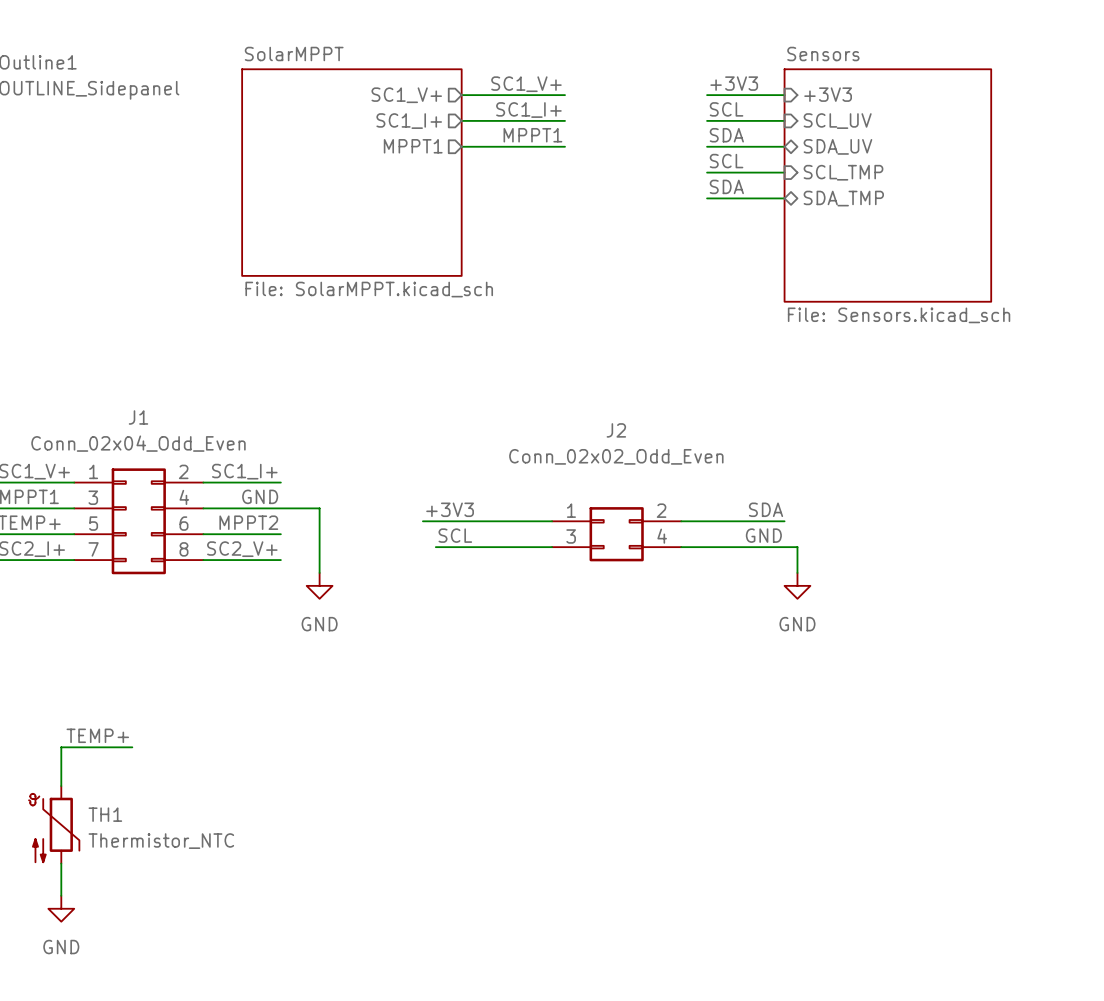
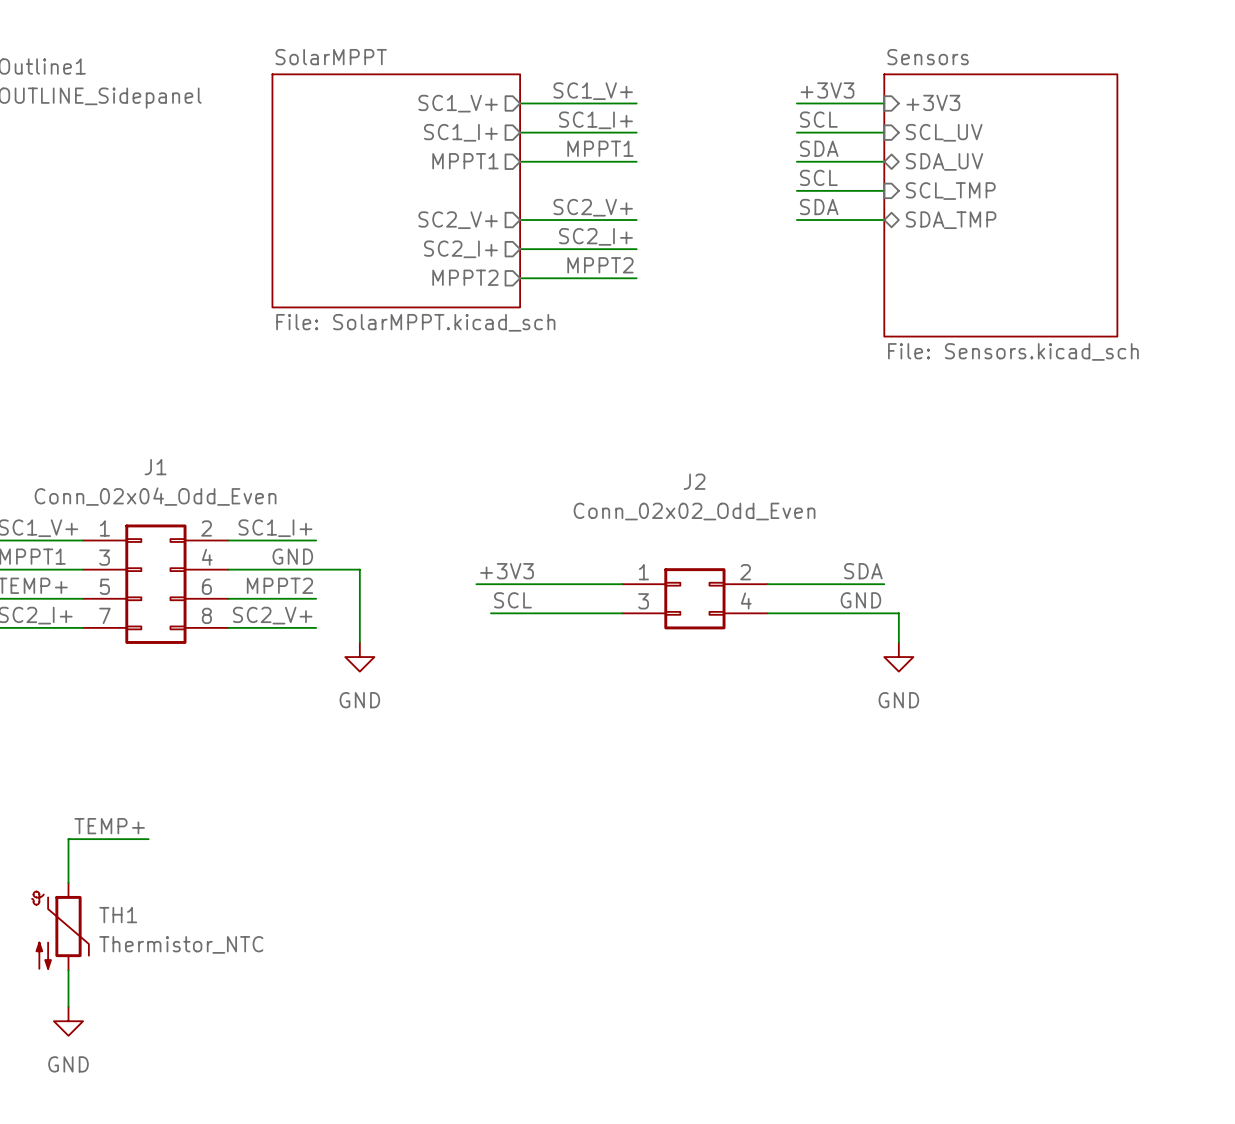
label: none -> SC2_V+ (593, 207)
sheet pin: none -> SC2_V+ (458, 220)
wire: none -> (520, 220) (636, 220)
label: none -> SC2_I+ (595, 236)
sheet pin: none -> SC2_I+ (460, 249)
wire: none -> (520, 249) (636, 249)
label: none -> MPPT2 (600, 265)
sheet pin: none -> MPPT2 (465, 277)
wire: none -> (520, 278) (636, 278)

